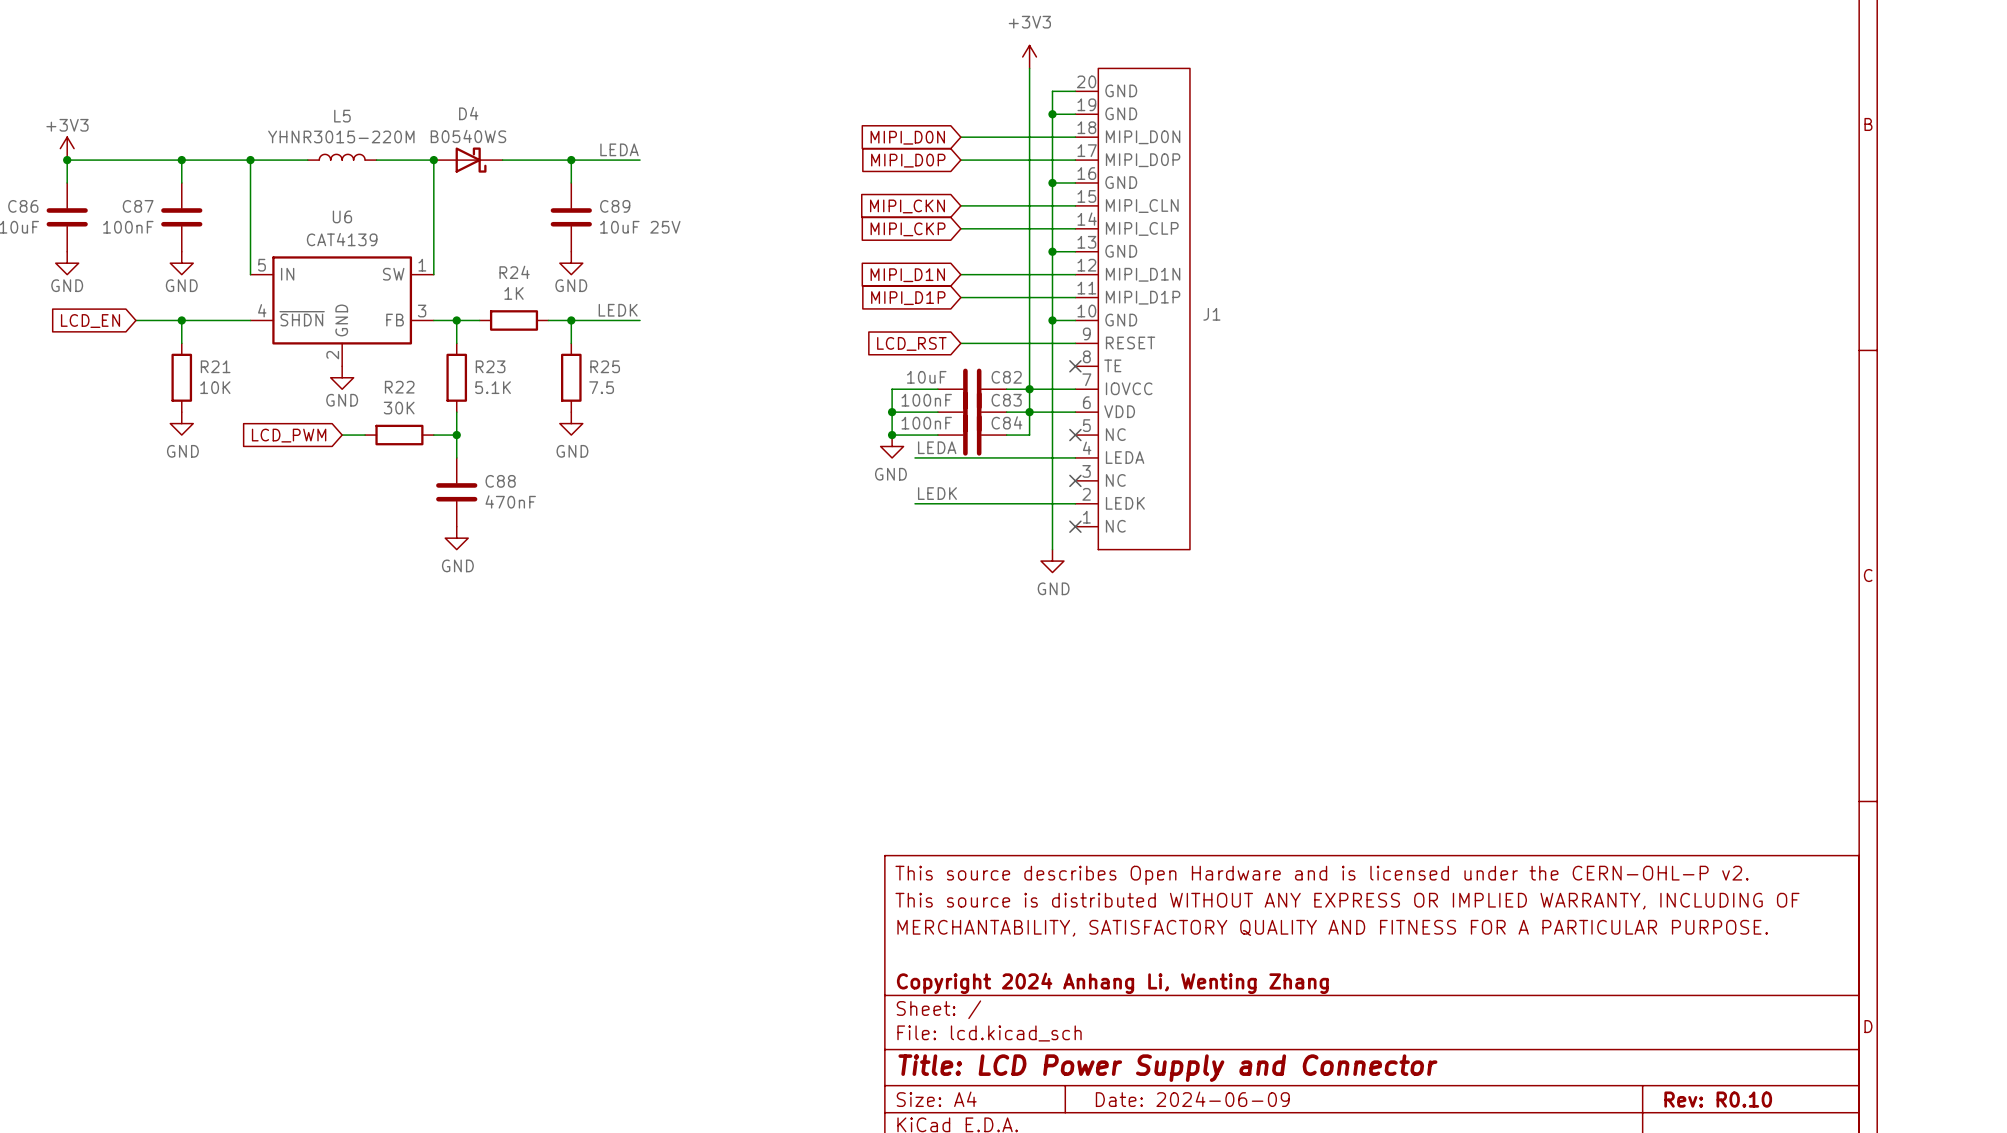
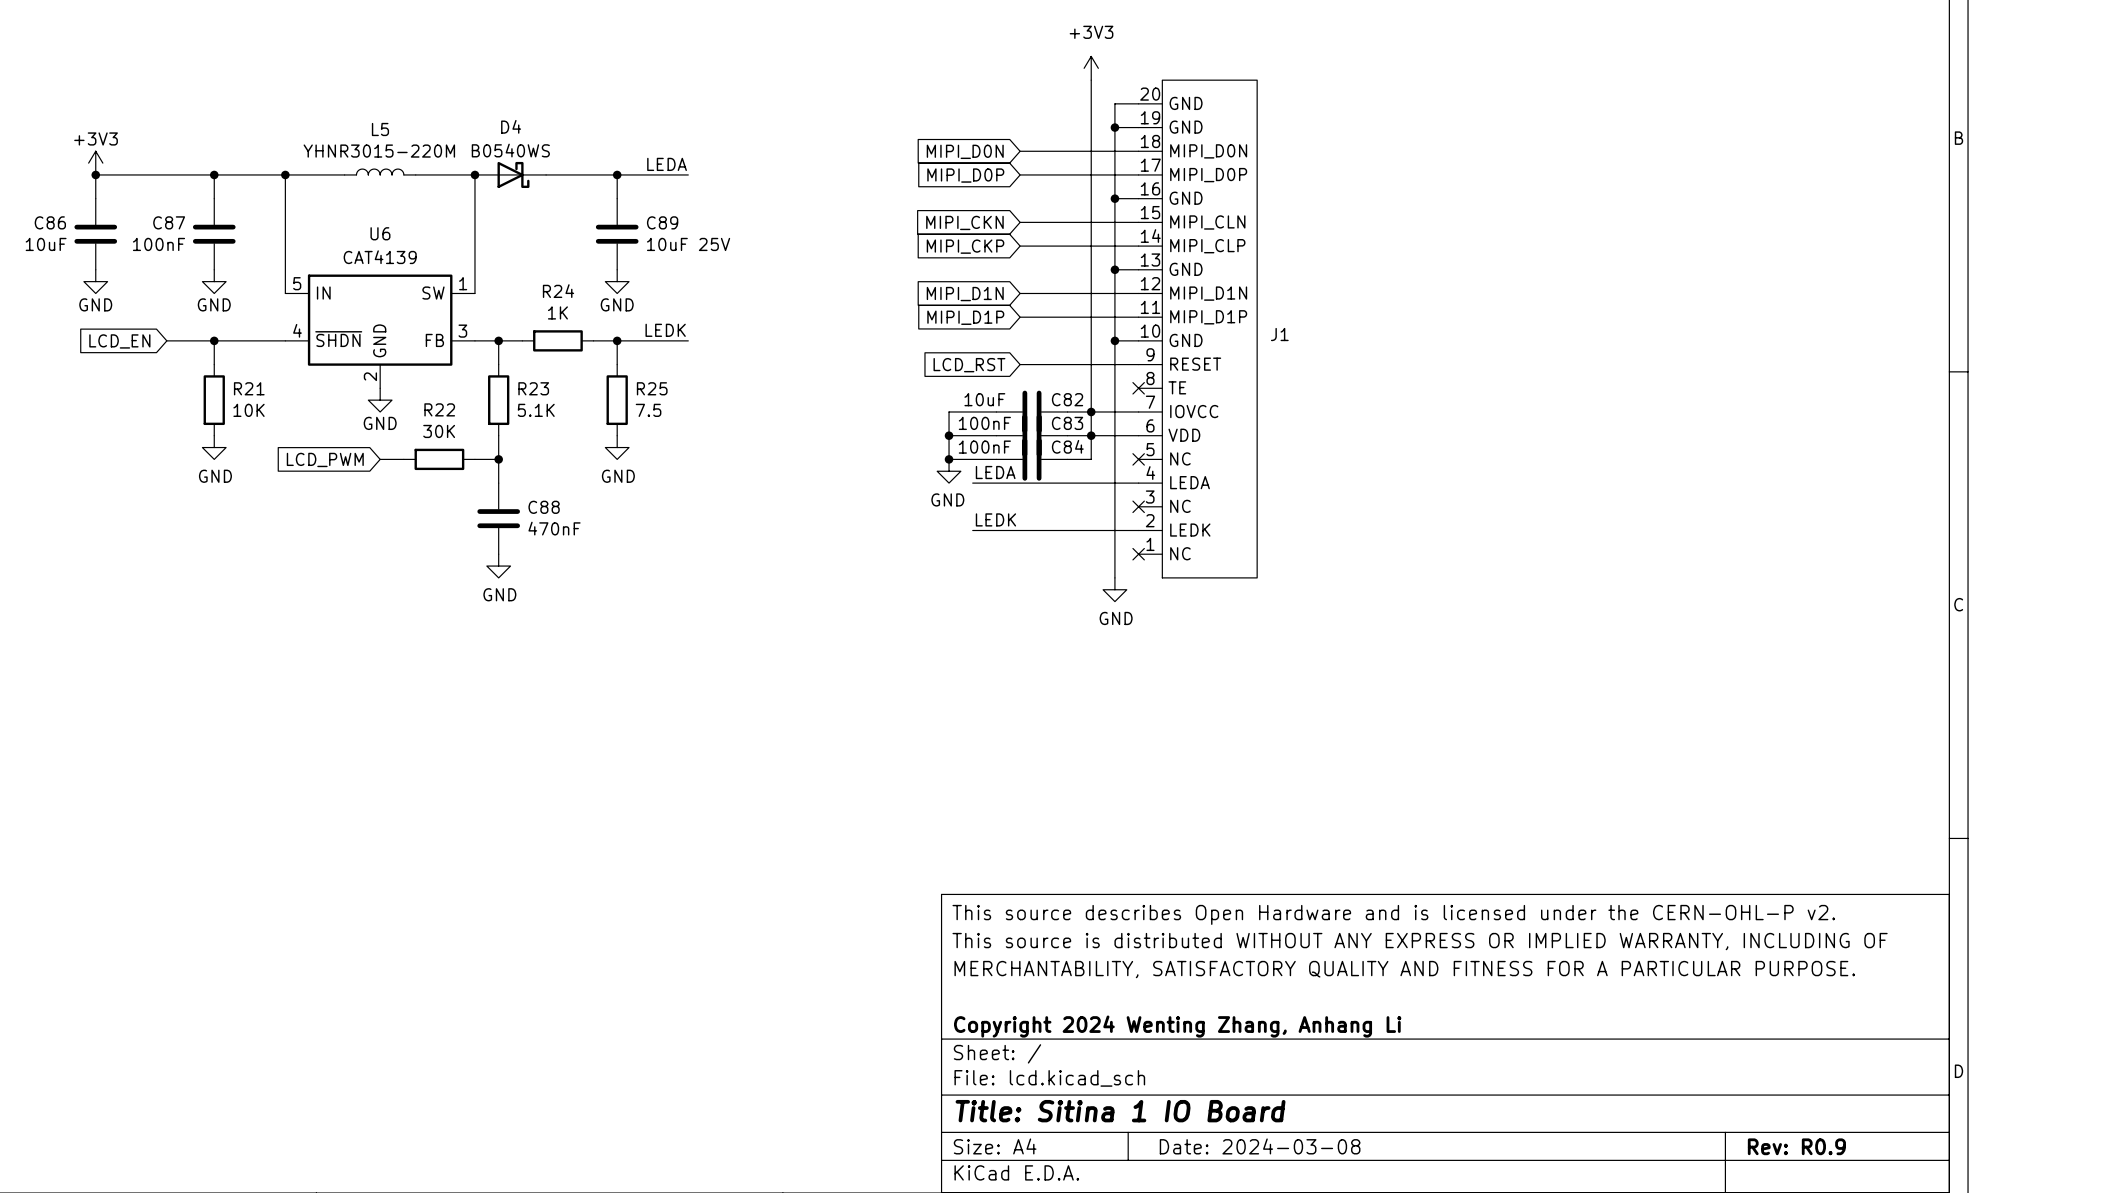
title block: Copyright 2024 Anhang Li, Wenting Zhang (1112, 983) -> Copyright 2024 Wenting Zhang, Anhang Li (1177, 1026)
title block: Title: LCD Power Supply and Connector (1167, 1068) -> Title: Sitina 1 IO Board (1120, 1111)
title block: Date: 2024-06-09 (1192, 1099) -> Date: 2024-03-08 (1260, 1146)
title block: Rev: R0.10 (1718, 1099) -> Rev: R0.9 (1796, 1146)

